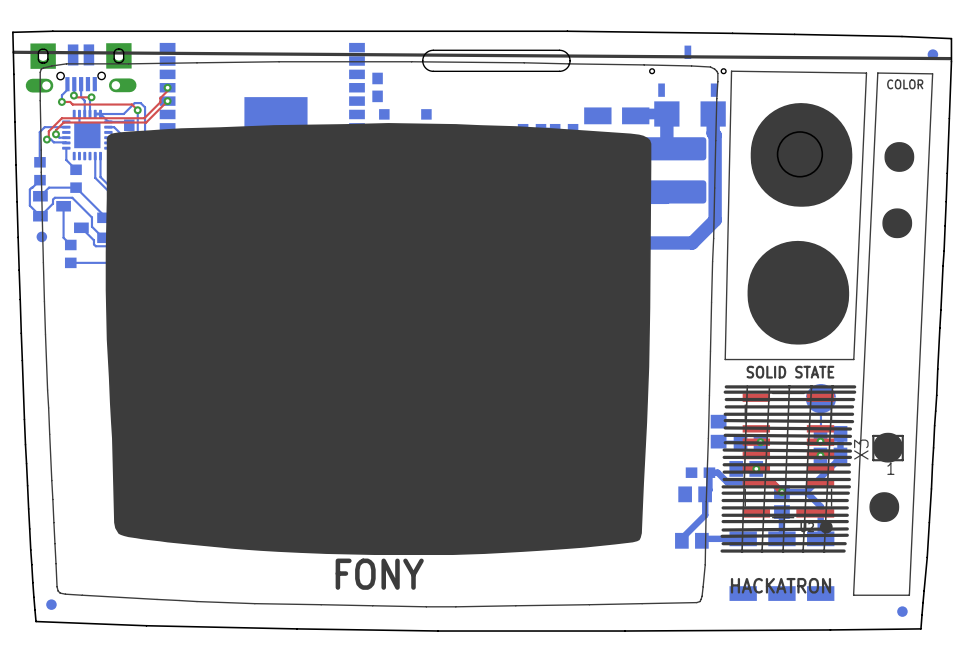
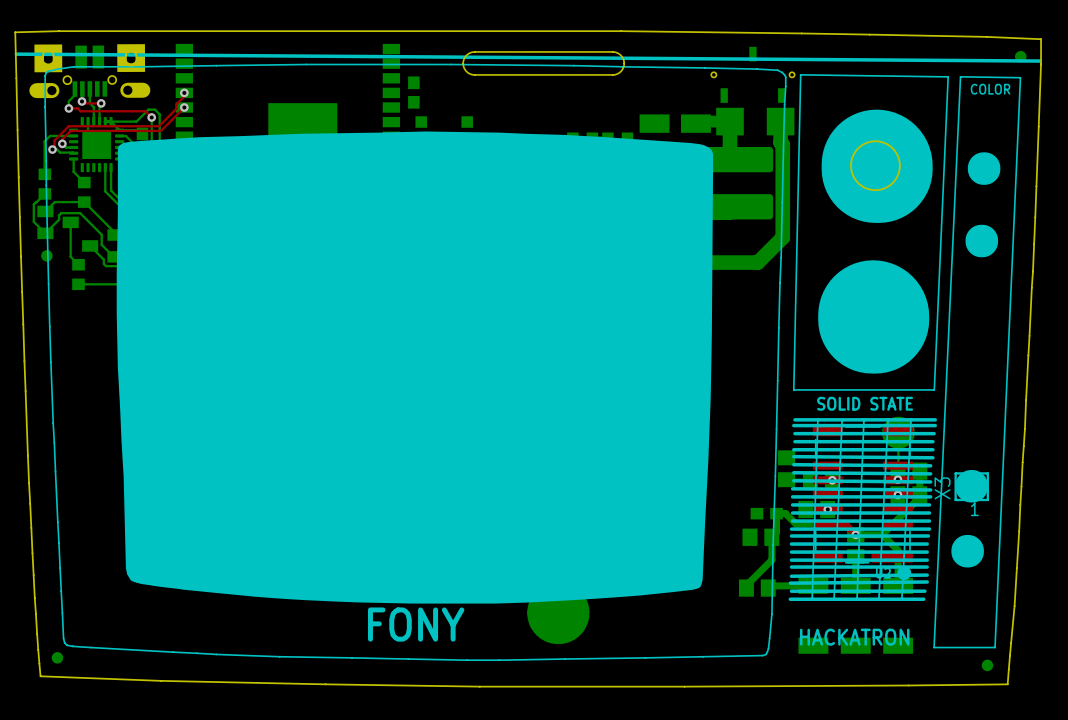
drawing: none -> [527, 548, 595, 644]

